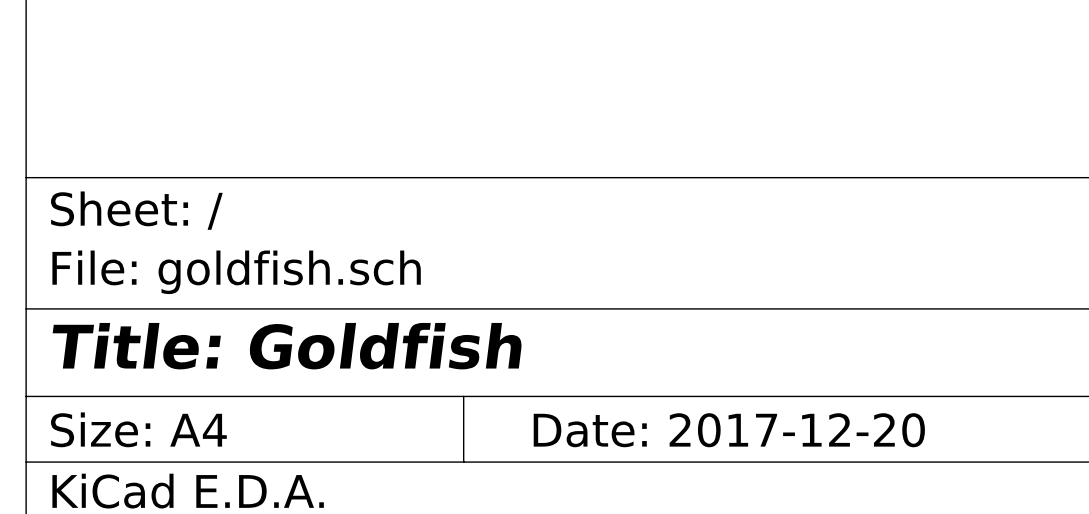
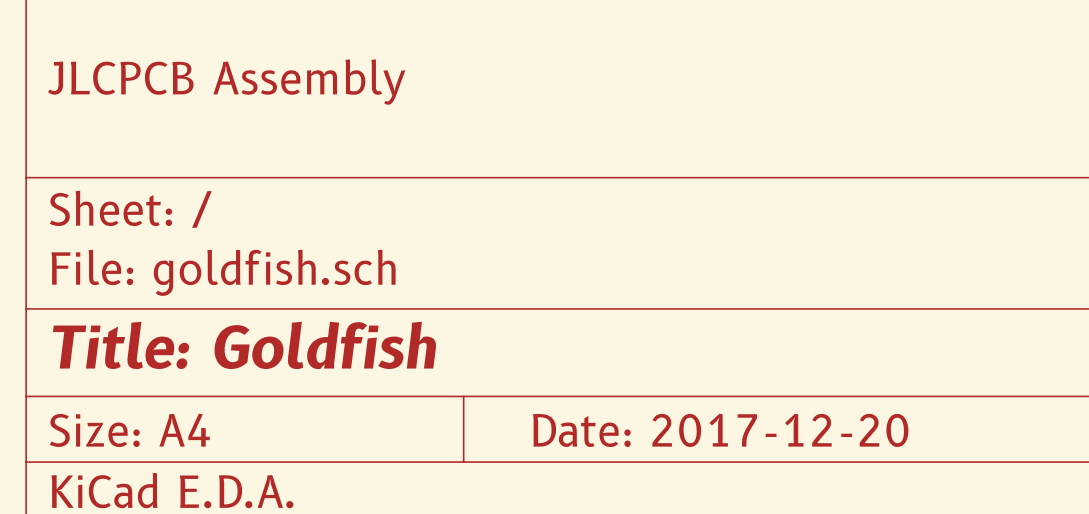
title block: none -> JLCPCB Assembly (226, 82)

